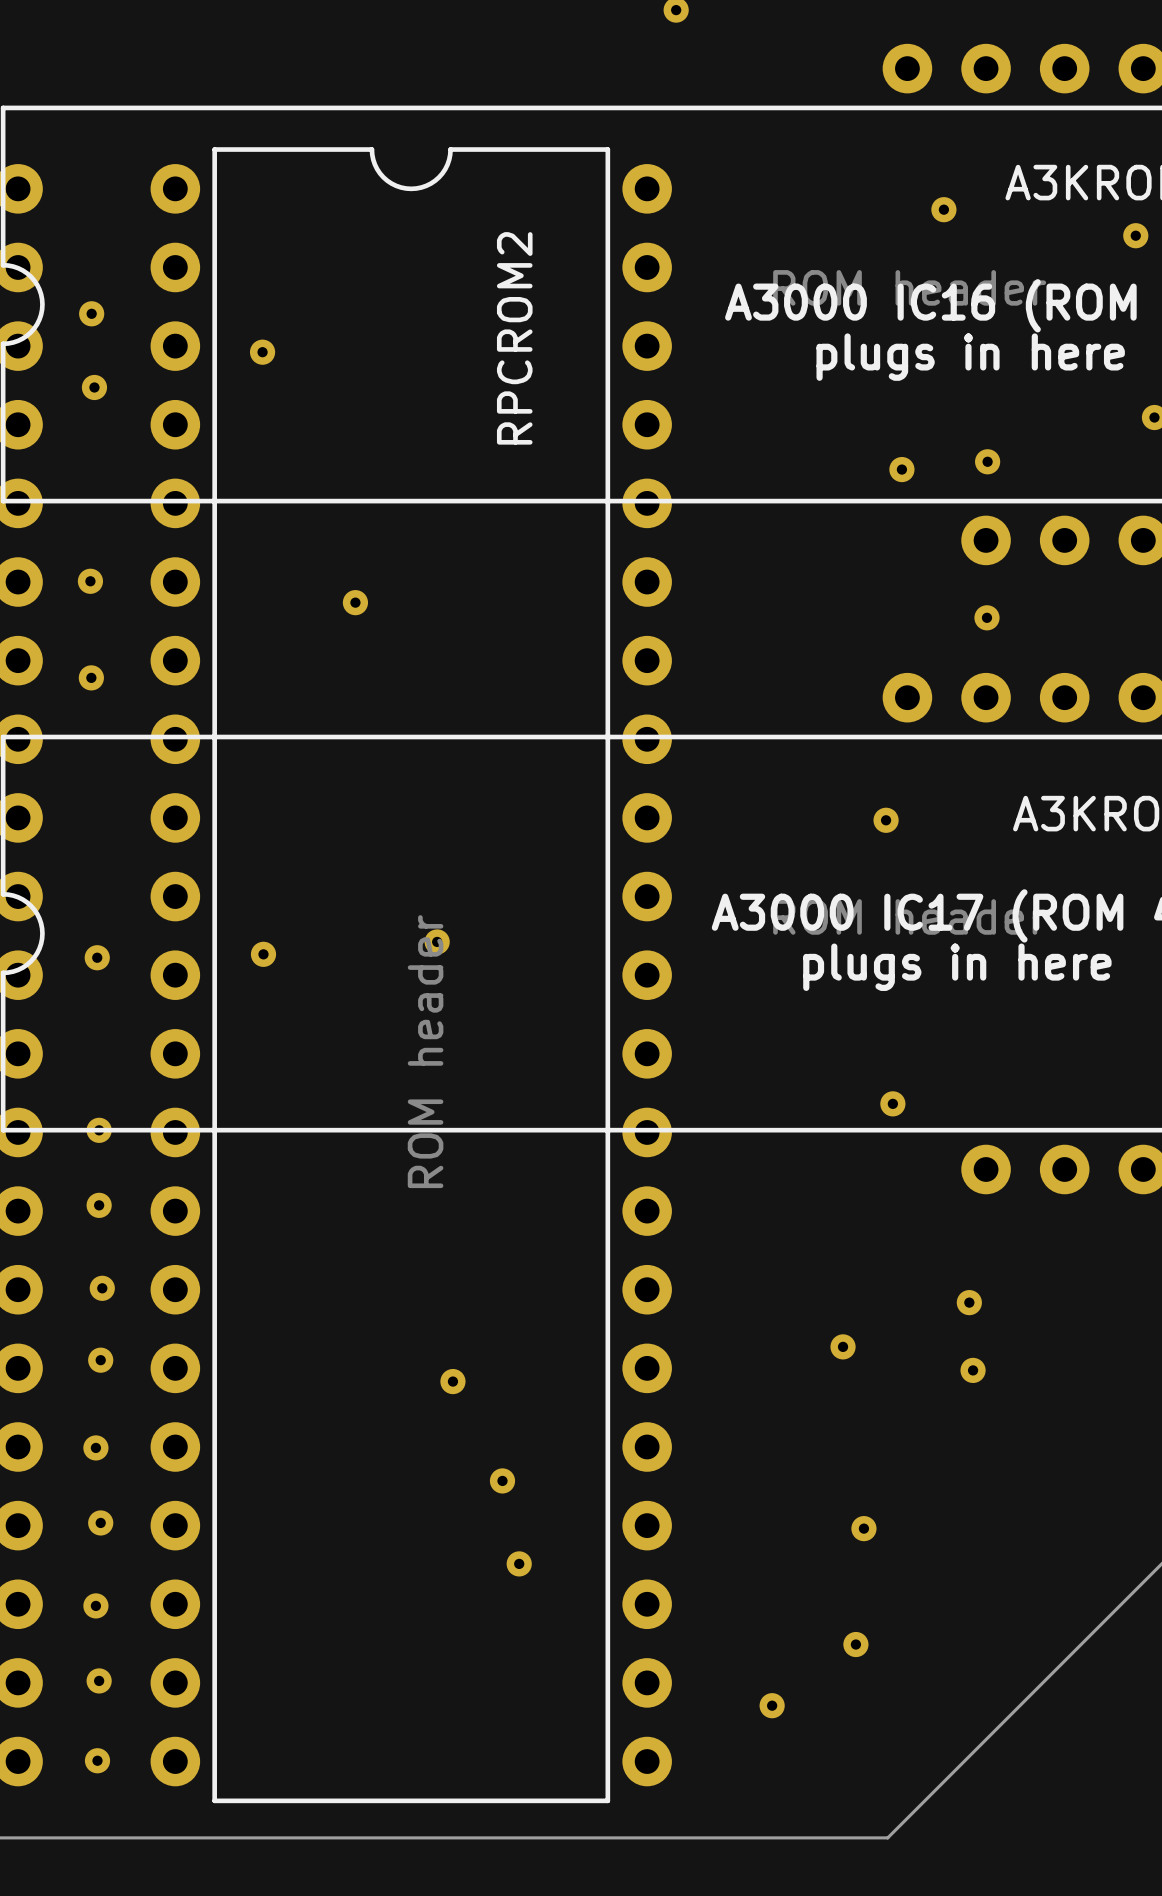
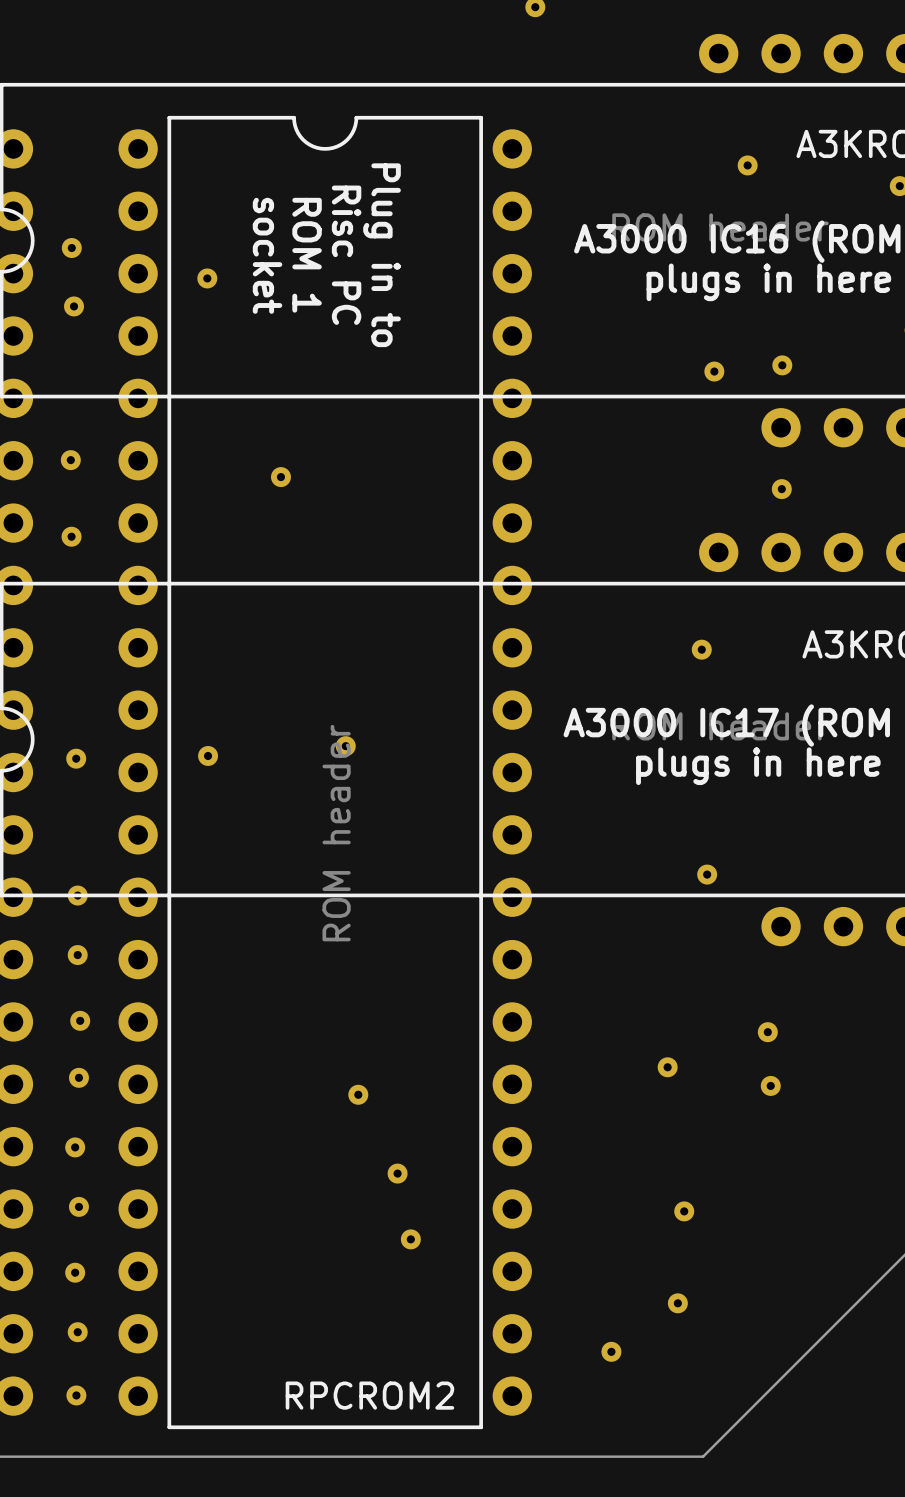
text: none -> ROM 1 (307, 255)
text: none -> Risc PC (346, 255)
text: none -> Plug in to (382, 255)
text: none -> socket (267, 255)
RPCROM2 name rotation: 0° (514, 338) -> 90° clockwise (369, 1395)
RPCROM2 name position: RPCROM2 (514, 338) -> RPCROM2 (369, 1395)

